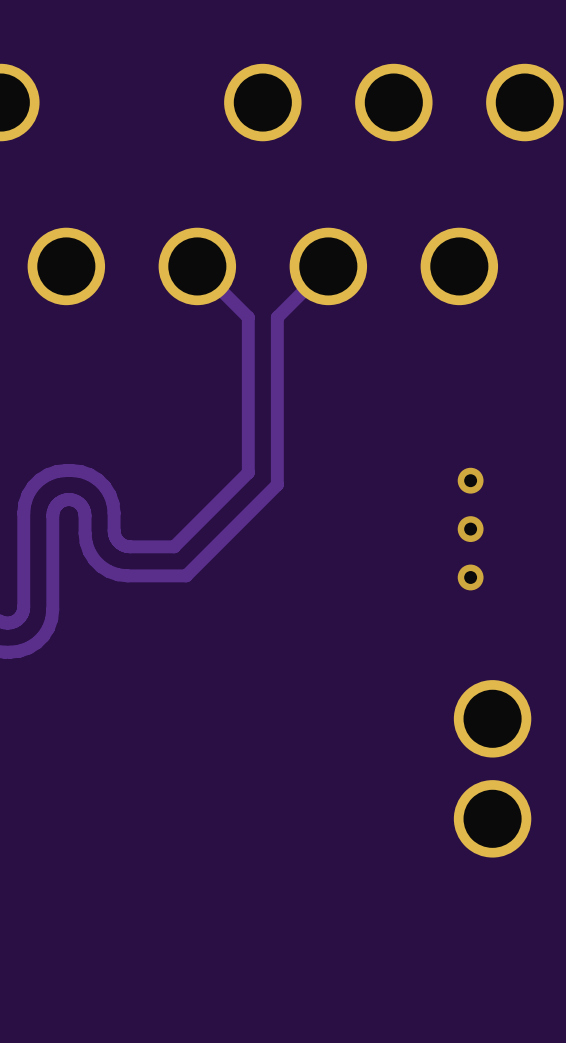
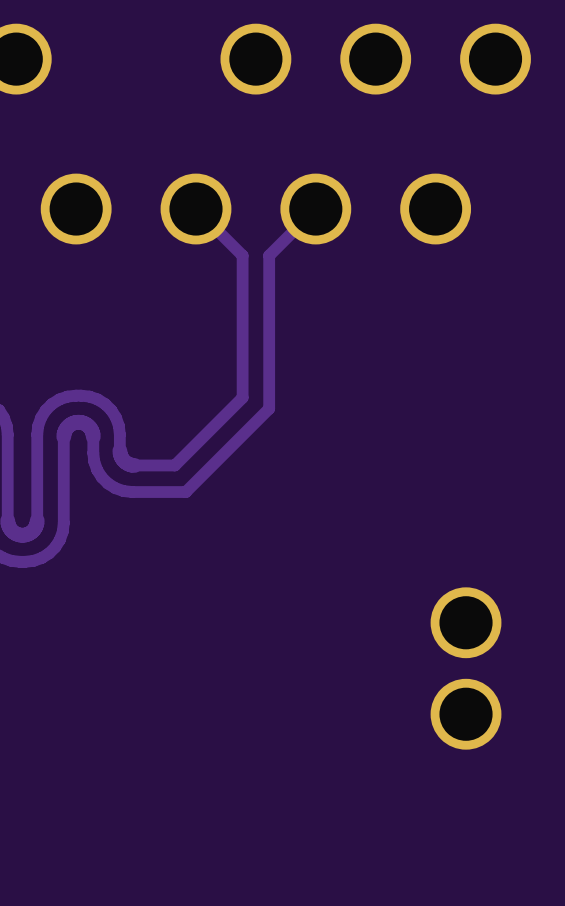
via: (470, 480) -> none
via: (470, 529) -> none
via: (470, 577) -> none

